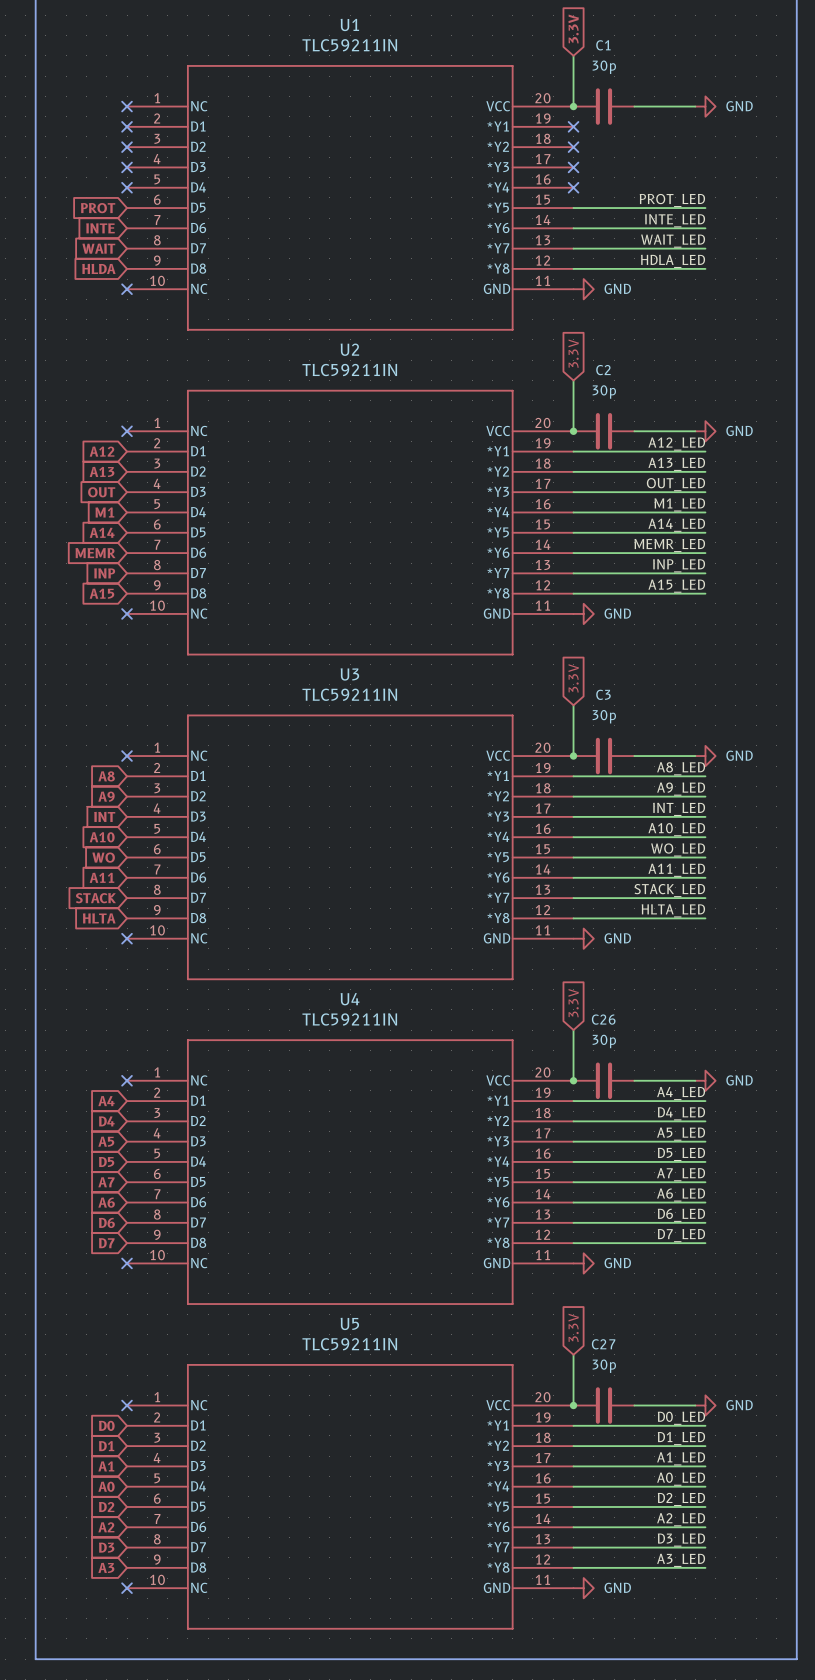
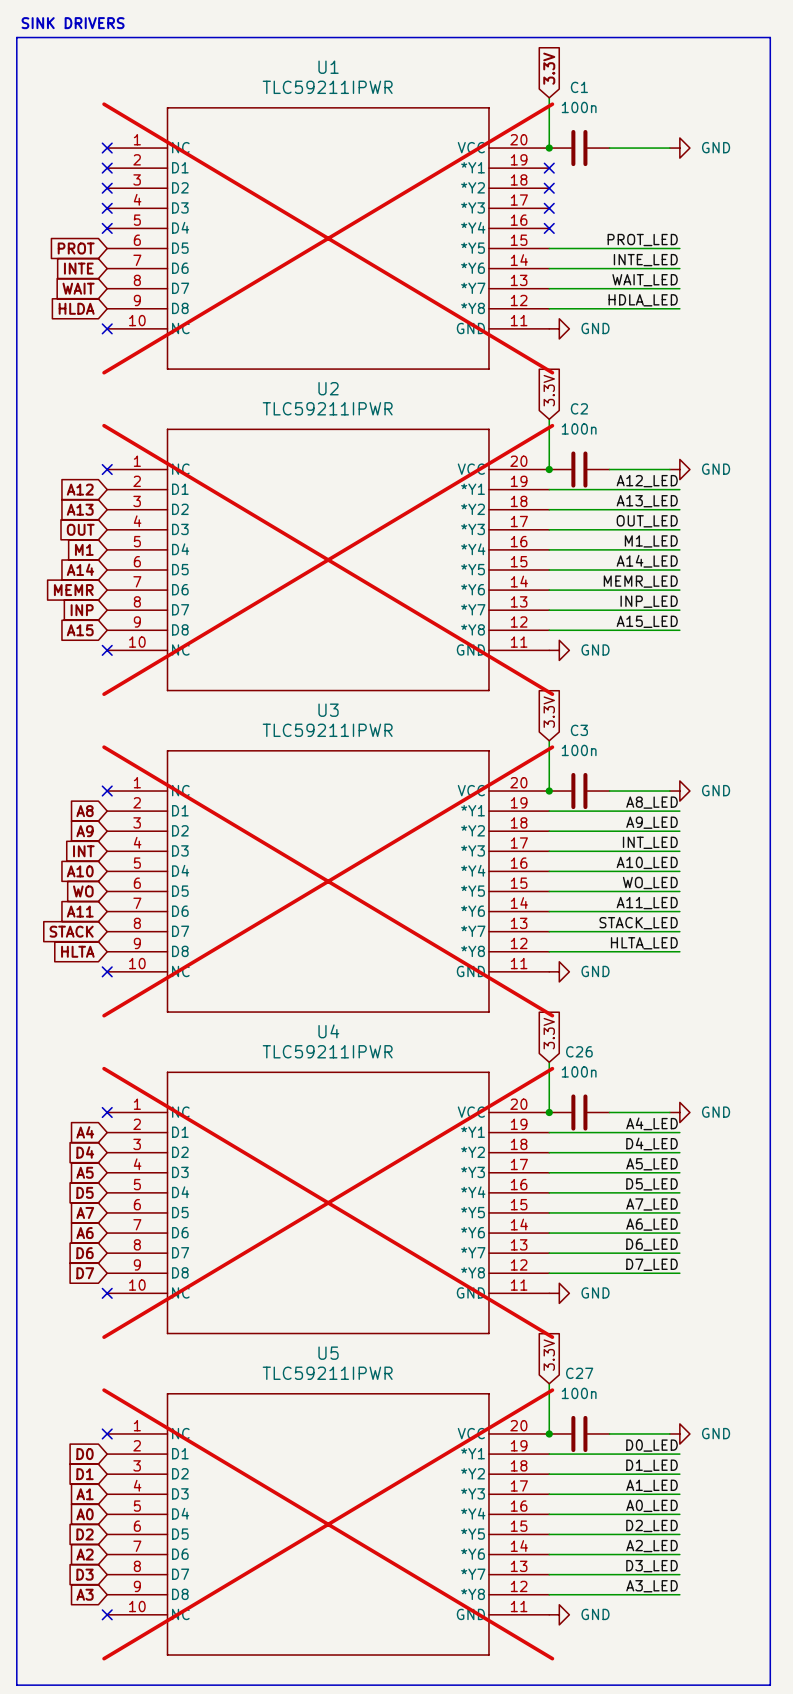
U1 value: TLC59211IN (349, 45) -> TLC59211IPWR (327, 87)
C1 value: 30p (604, 67) -> 100n (579, 107)
U1 do-not-place cross: none -> (328, 238)
U2 value: TLC59211IN (349, 370) -> TLC59211IPWR (327, 408)
C2 value: 30p (604, 391) -> 100n (579, 428)
U2 do-not-place cross: none -> (328, 559)
U3 value: TLC59211IN (349, 694) -> TLC59211IPWR (327, 730)
C3 value: 30p (604, 716) -> 100n (579, 750)
U3 do-not-place cross: none -> (328, 881)
U4 value: TLC59211IN (349, 1019) -> TLC59211IPWR (327, 1051)
C26 value: 30p (604, 1041) -> 100n (579, 1071)
U4 do-not-place cross: none -> (328, 1202)
U5 value: TLC59211IN (349, 1344) -> TLC59211IPWR (327, 1373)
C27 value: 30p (604, 1366) -> 100n (579, 1393)
U5 do-not-place cross: none -> (328, 1524)

